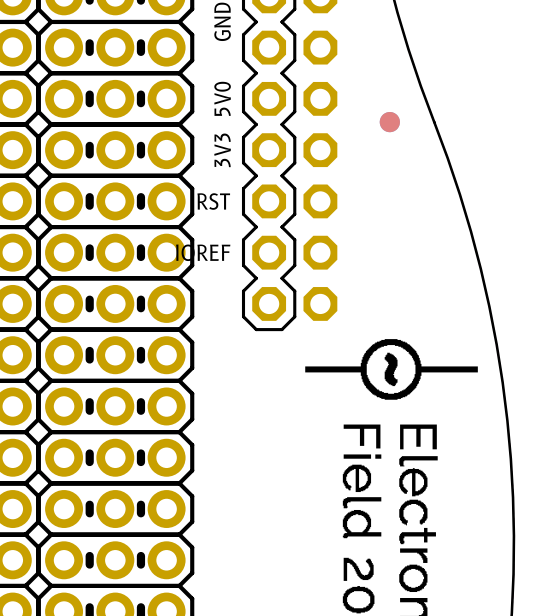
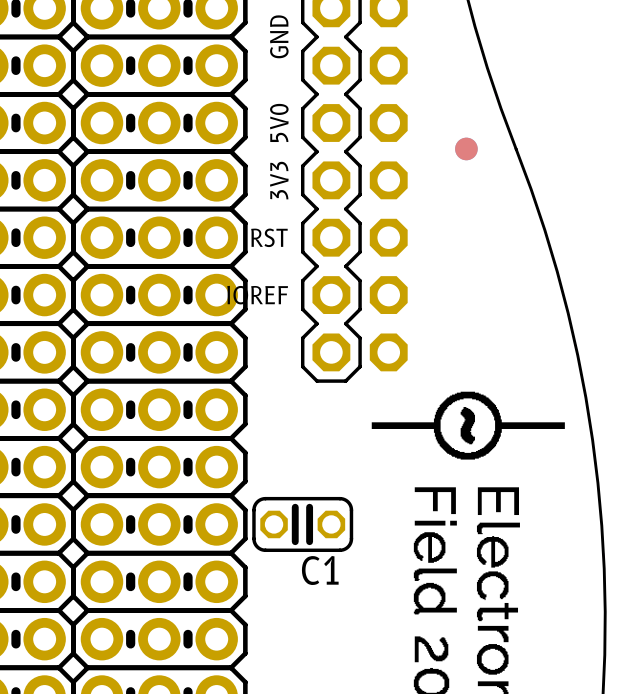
C1: none -> (302, 524)

